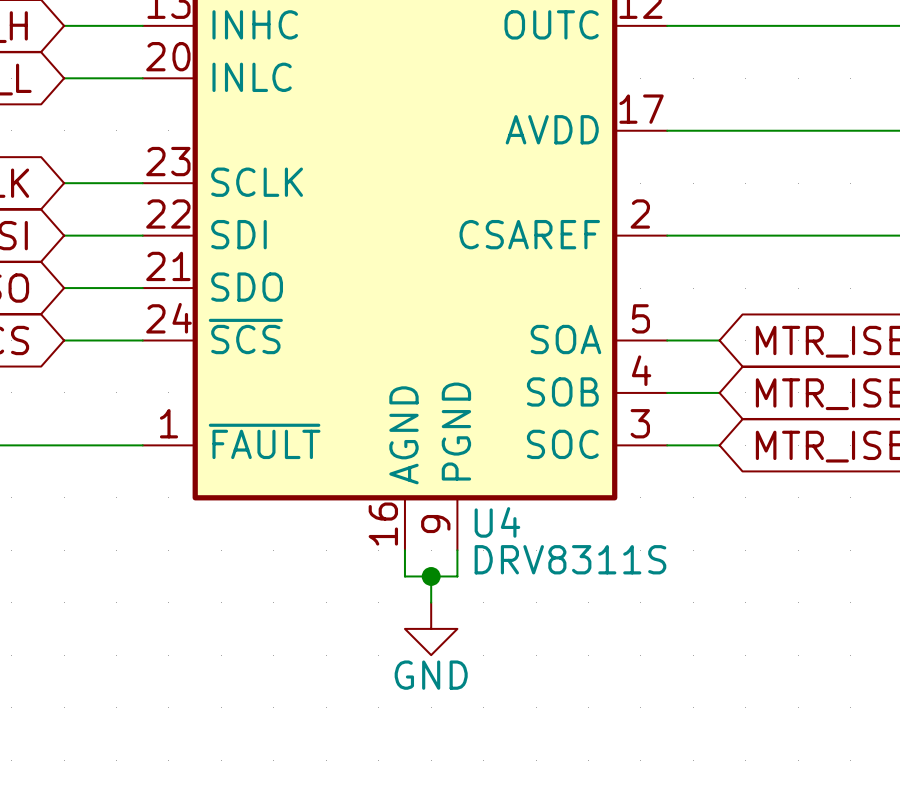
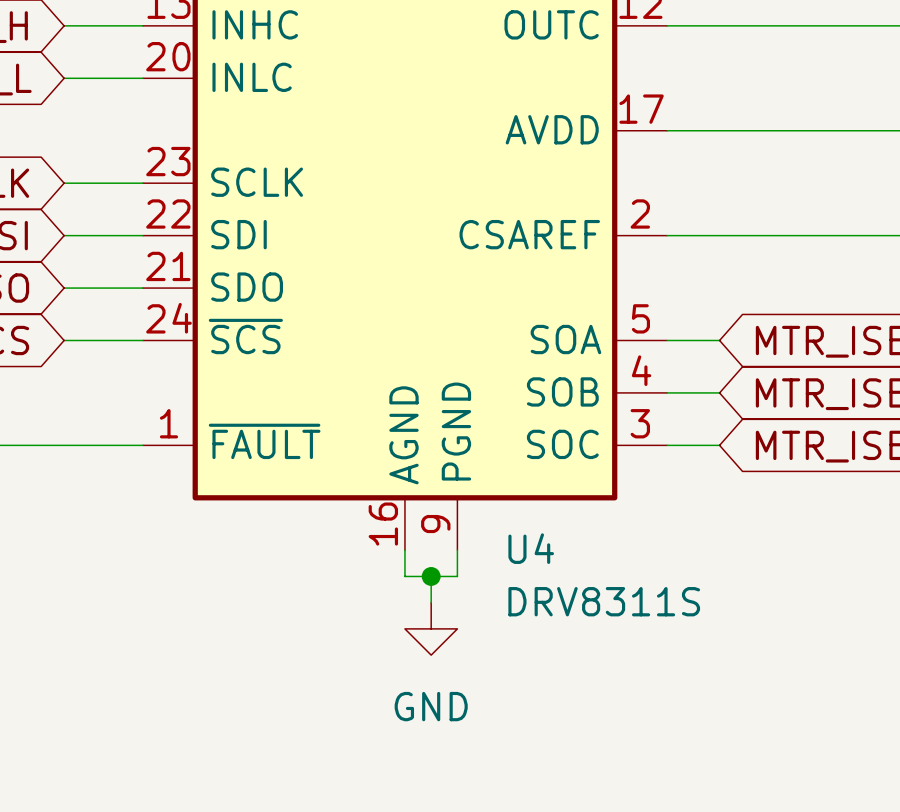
U4 name position: U4 (497, 522) -> U4 (531, 548)
U4 value position: DRV8311S (570, 559) -> DRV8311S (604, 601)
power symbol text position: GND (431, 675) -> GND (431, 706)

